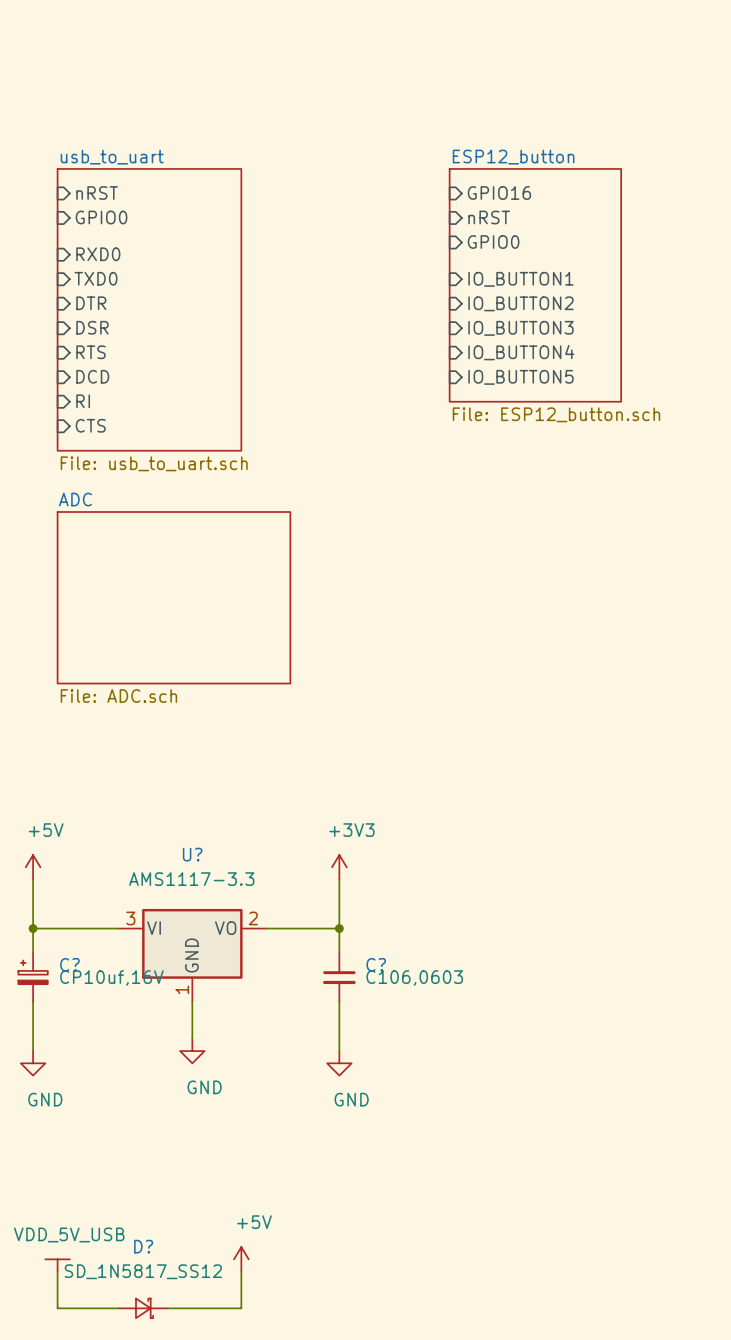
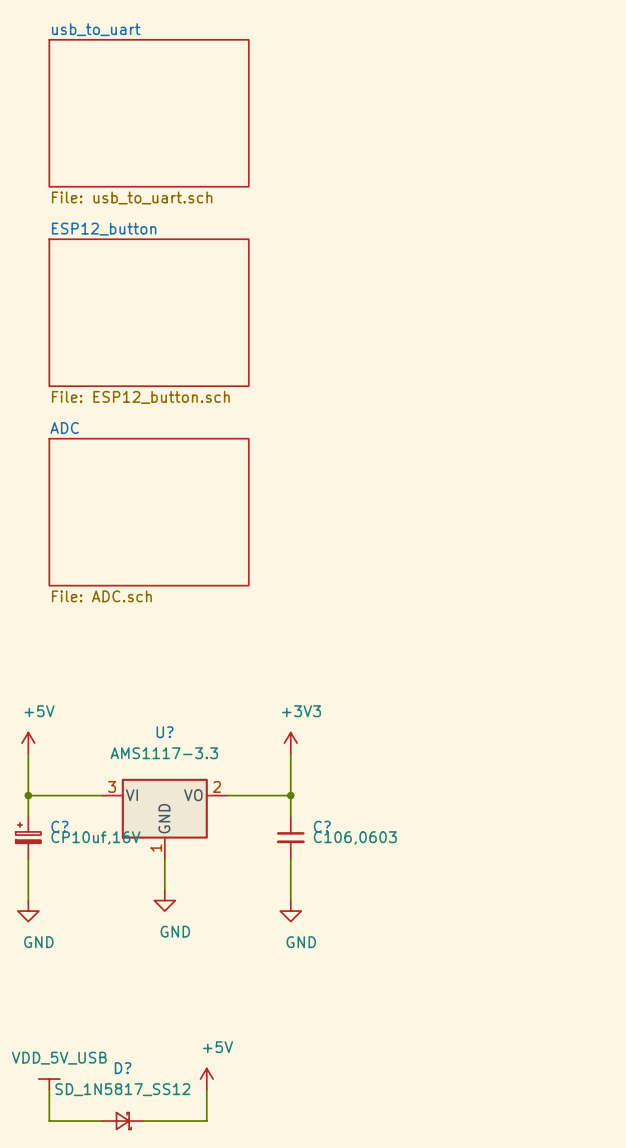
sheet usb_to_uart: none -> File: usb_to_uart.sch (149, 113)
sheet ESP12_button name position: ESP12_button (513, 157) -> ESP12_button (104, 229)
sheet pin: nRST (97, 193) -> none
sheet pin: GPIO16 (499, 193) -> none
sheet pin: GPIO0 (101, 217) -> none
sheet pin: nRST (489, 217) -> none
sheet pin: GPIO0 (493, 242) -> none
sheet pin: RXD0 (98, 254) -> none
sheet pin: TXD0 (95, 278) -> none
sheet pin: IO_BUTTON1 (520, 279) -> none
sheet ESP12_button rotation: 0° (535, 285) -> 90° clockwise (149, 312)
sheet ESP12_button position: (535, 285) -> (149, 312)
sheet pin: DTR (91, 303) -> none
sheet pin: IO_BUTTON2 (520, 303) -> none
sheet usb_to_uart: File: usb_to_uart.sch (149, 309) -> none
sheet pin: DSR (92, 327) -> none
sheet pin: IO_BUTTON3 (520, 328) -> none
sheet pin: RTS (91, 352) -> none
sheet pin: IO_BUTTON4 (521, 352) -> none
sheet pin: DCD (92, 376) -> none
sheet pin: IO_BUTTON5 (520, 377) -> none
sheet pin: RI (83, 401) -> none
sheet ESP12_button value position: File: ESP12_button.sch (556, 414) -> File: ESP12_button.sch (140, 397)
sheet pin: CTS (90, 425) -> none

